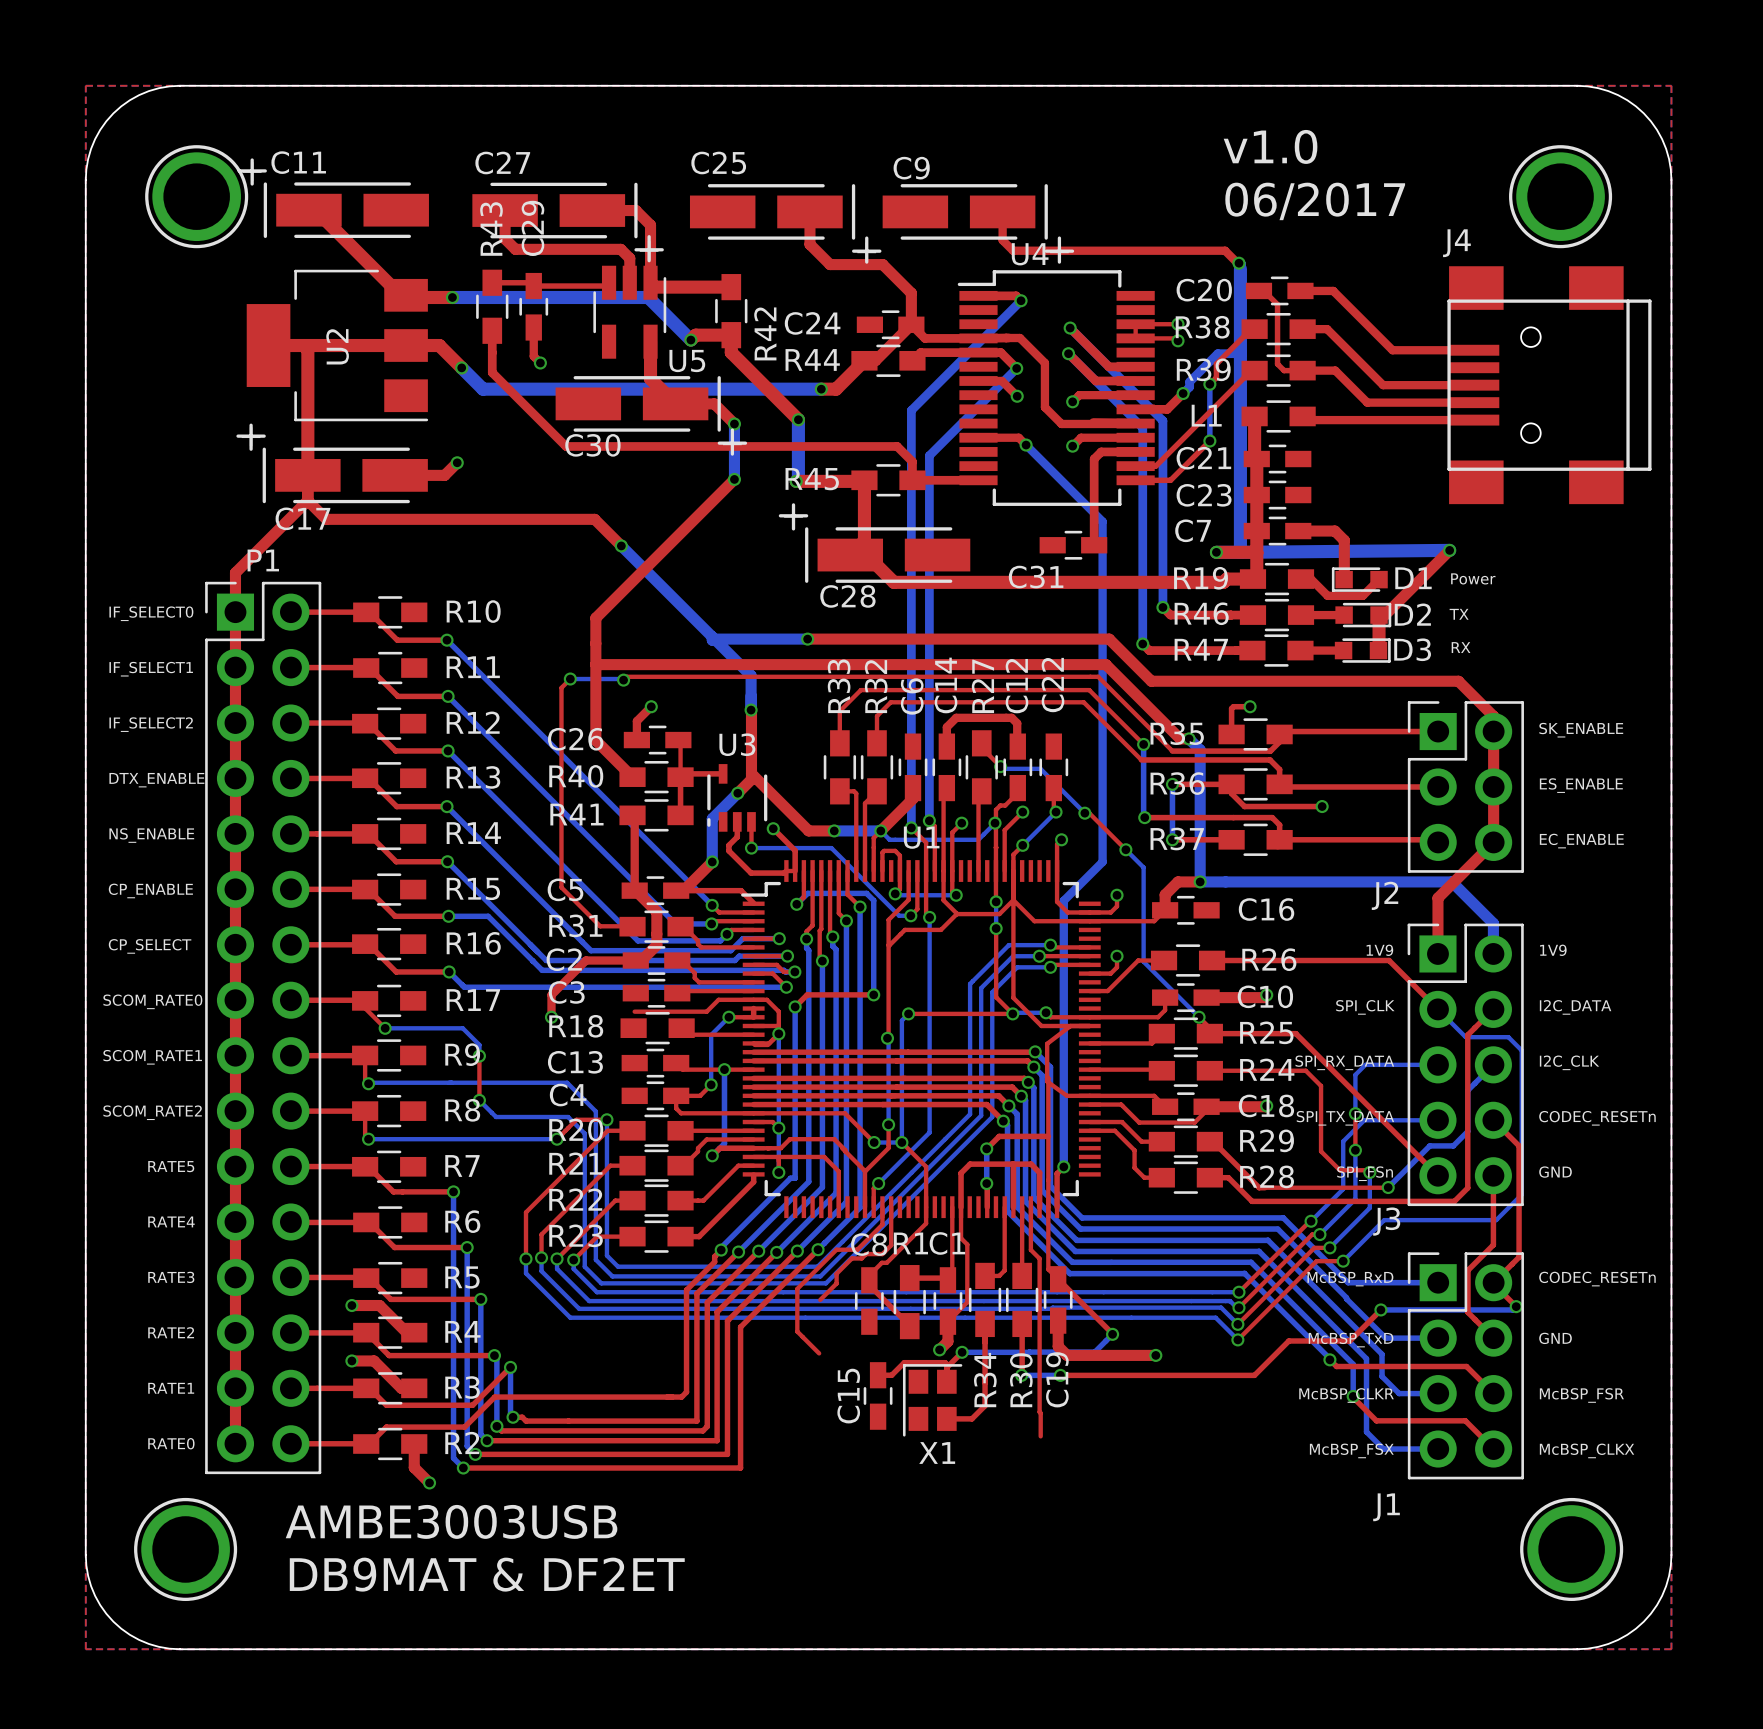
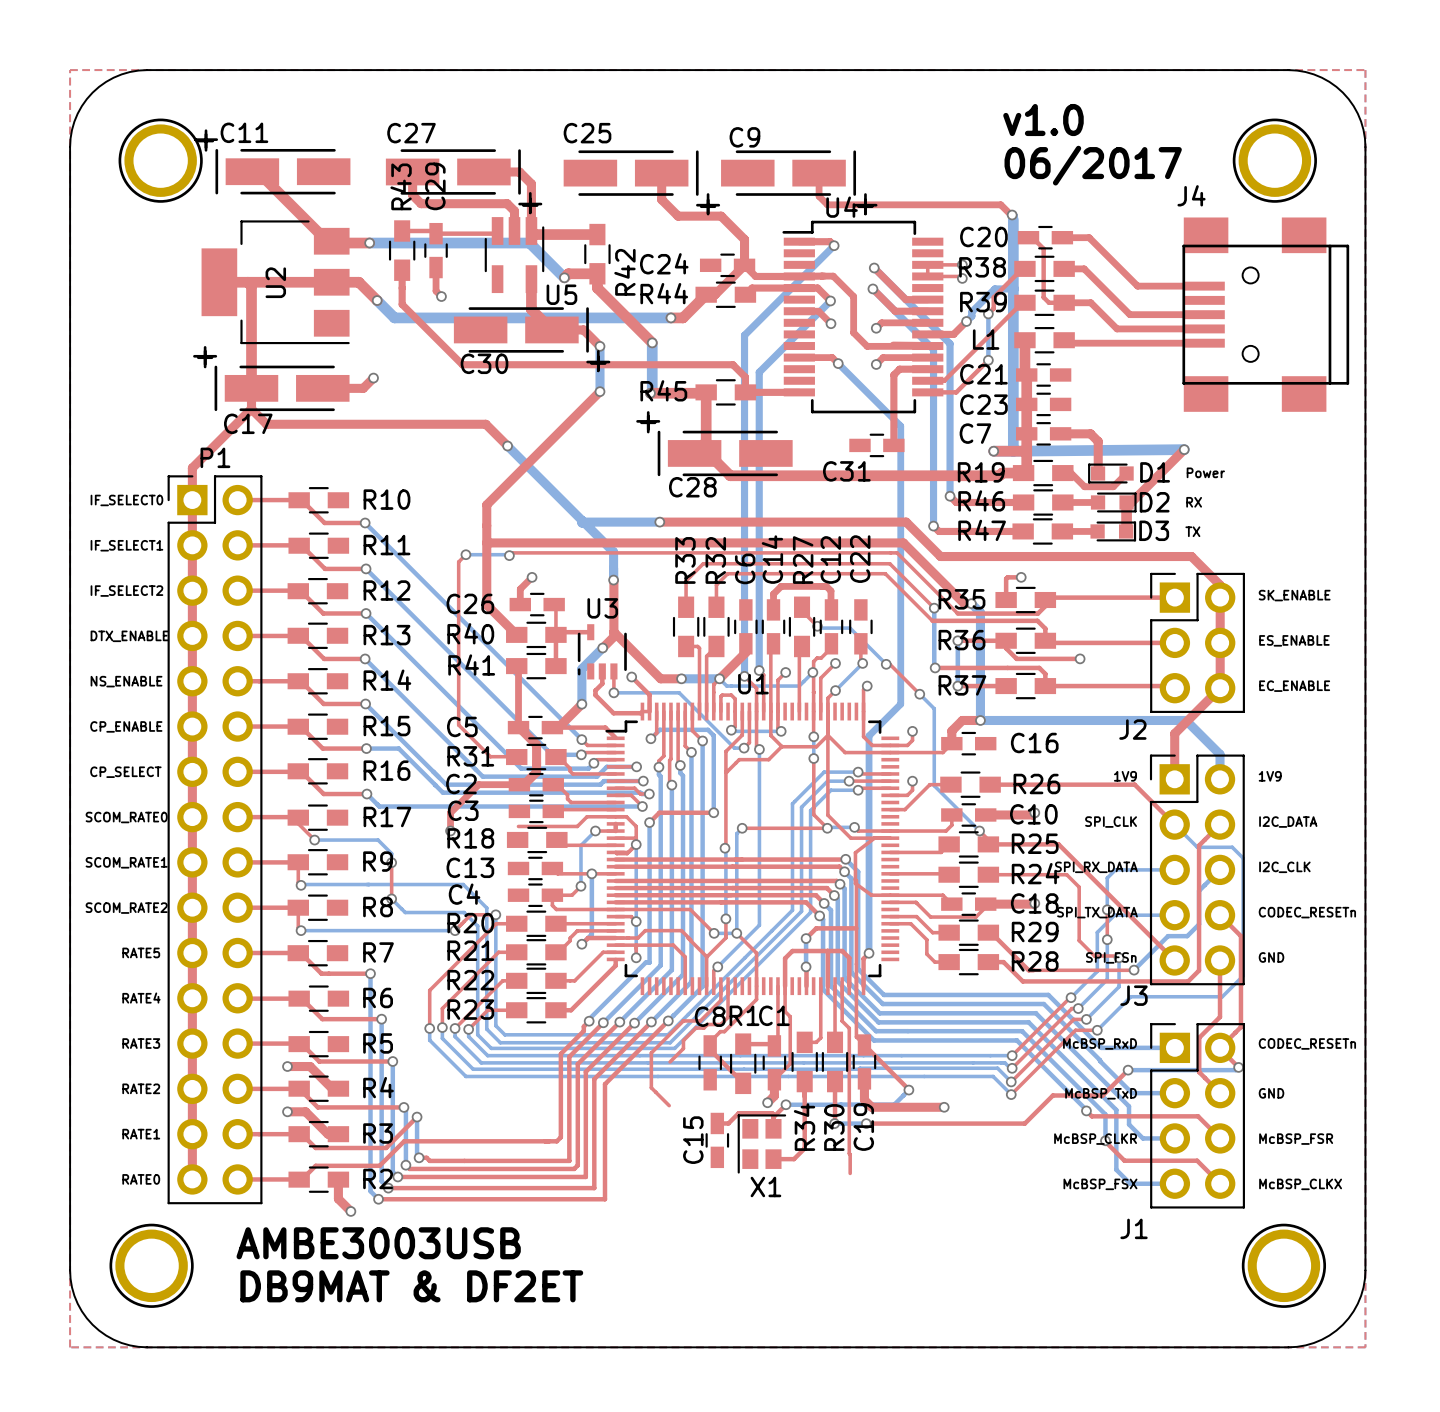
text: TX (1459, 614) -> RX (1194, 502)
text: RX (1461, 647) -> TX (1192, 531)

